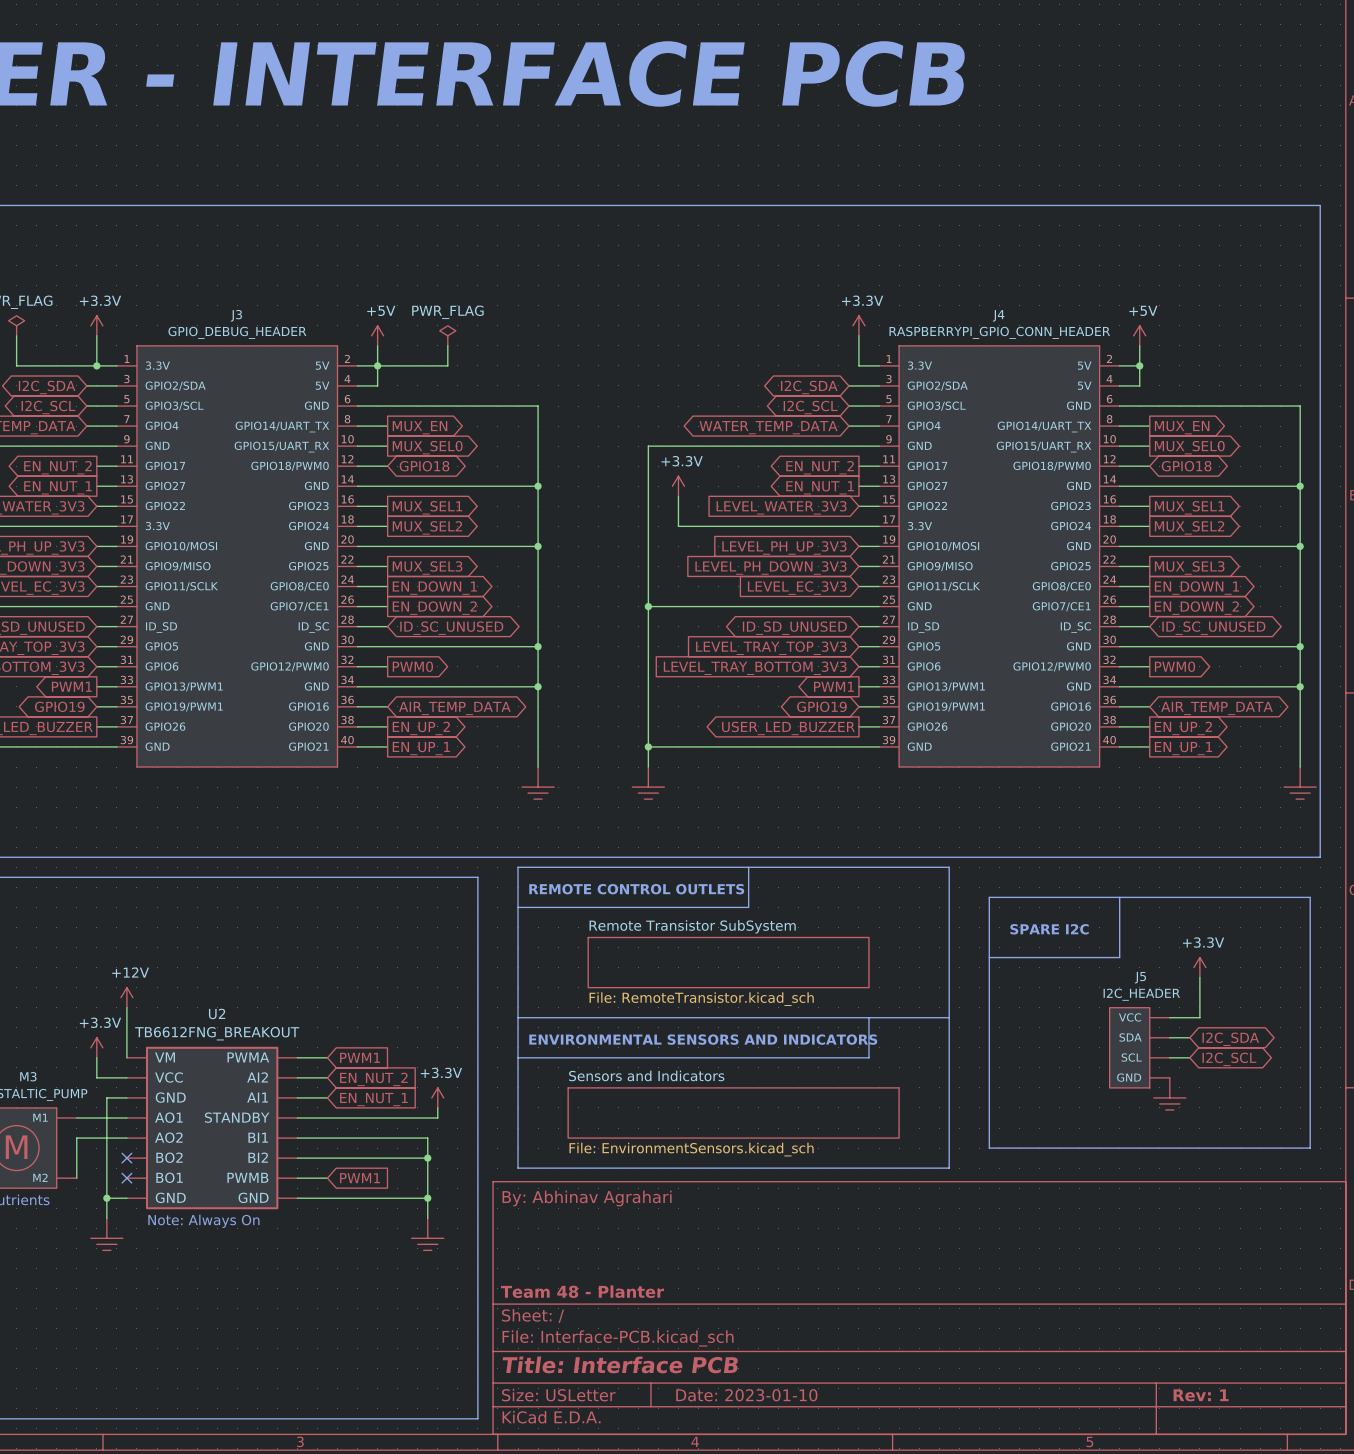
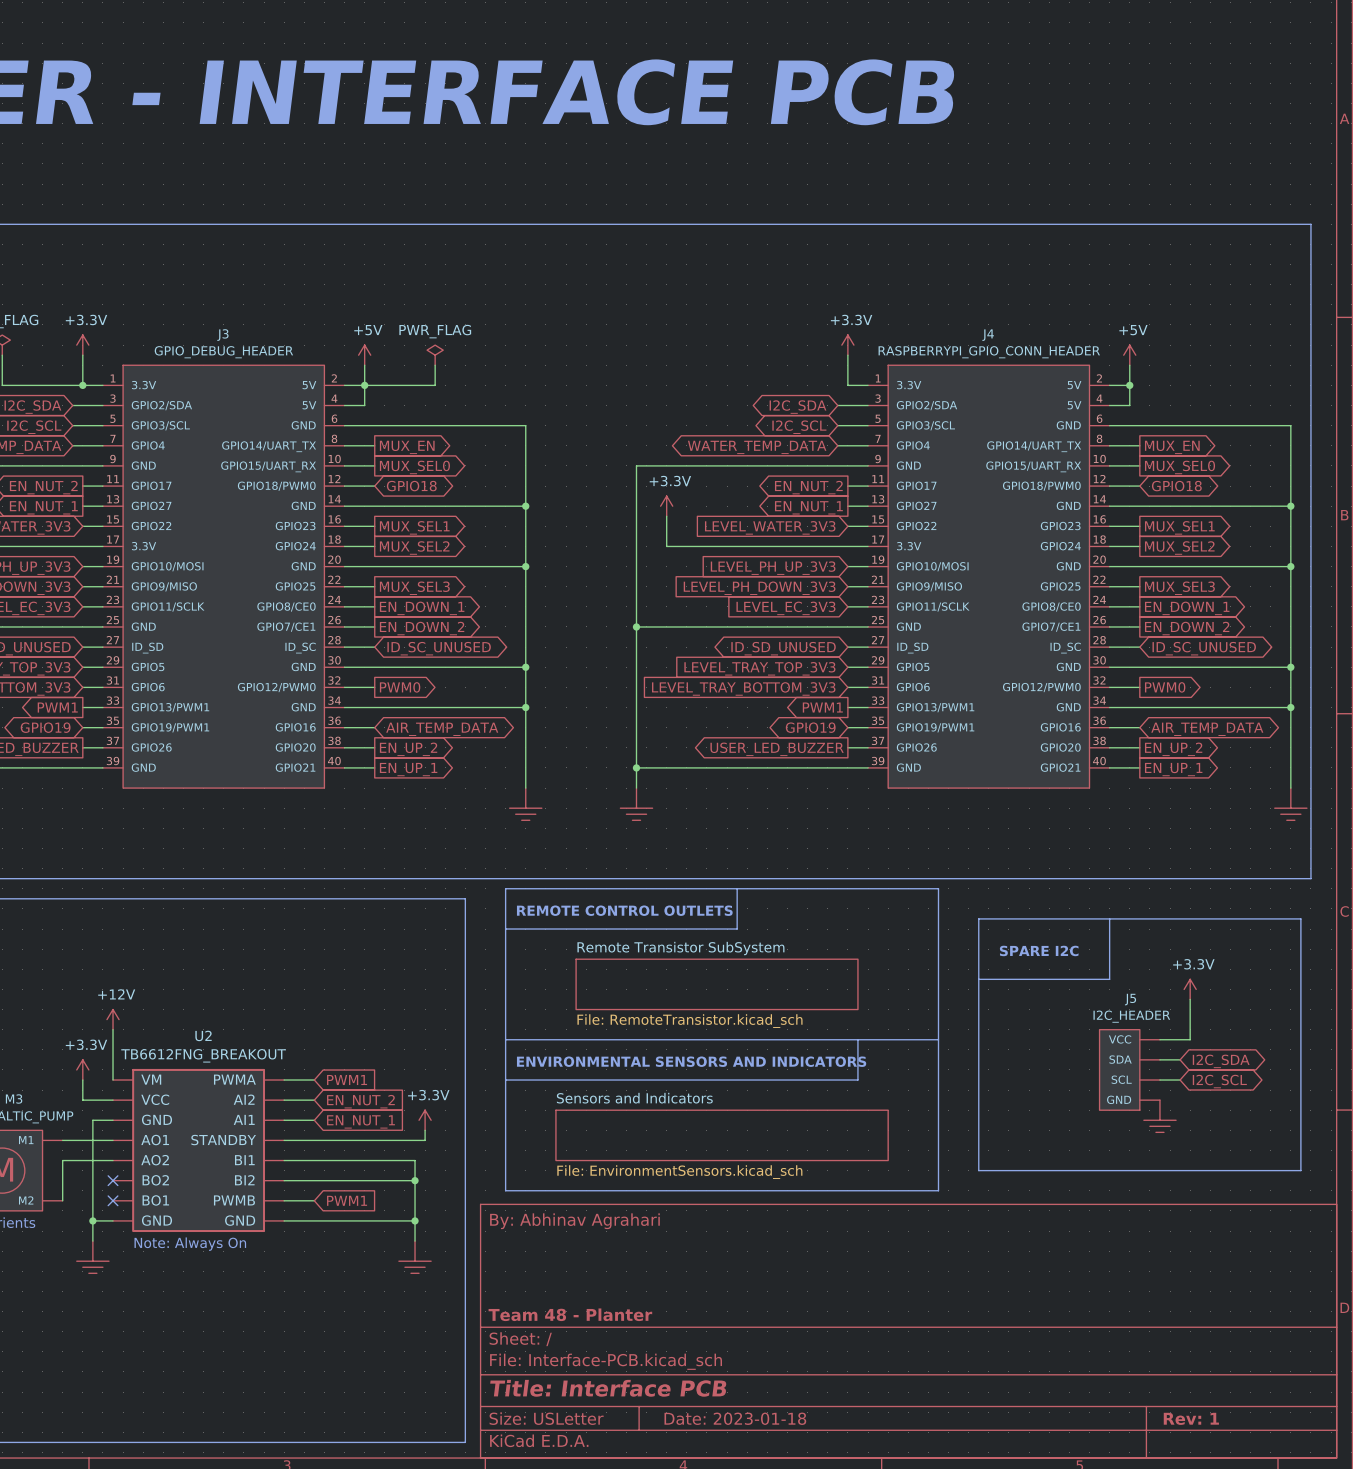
title block: Date: 2023-01-10 (746, 1395) -> Date: 2023-01-18 (735, 1418)

